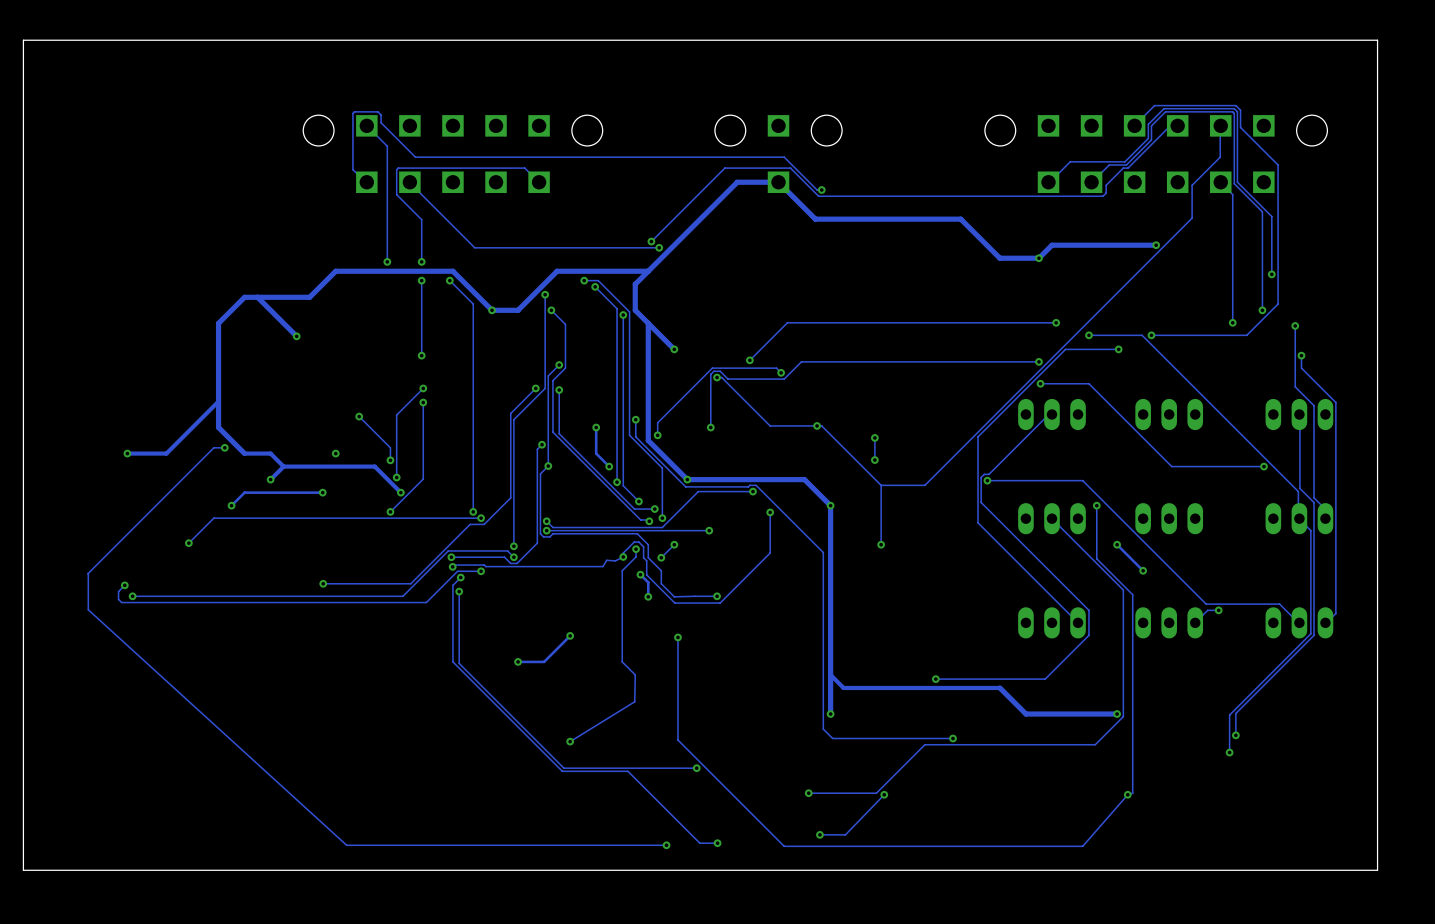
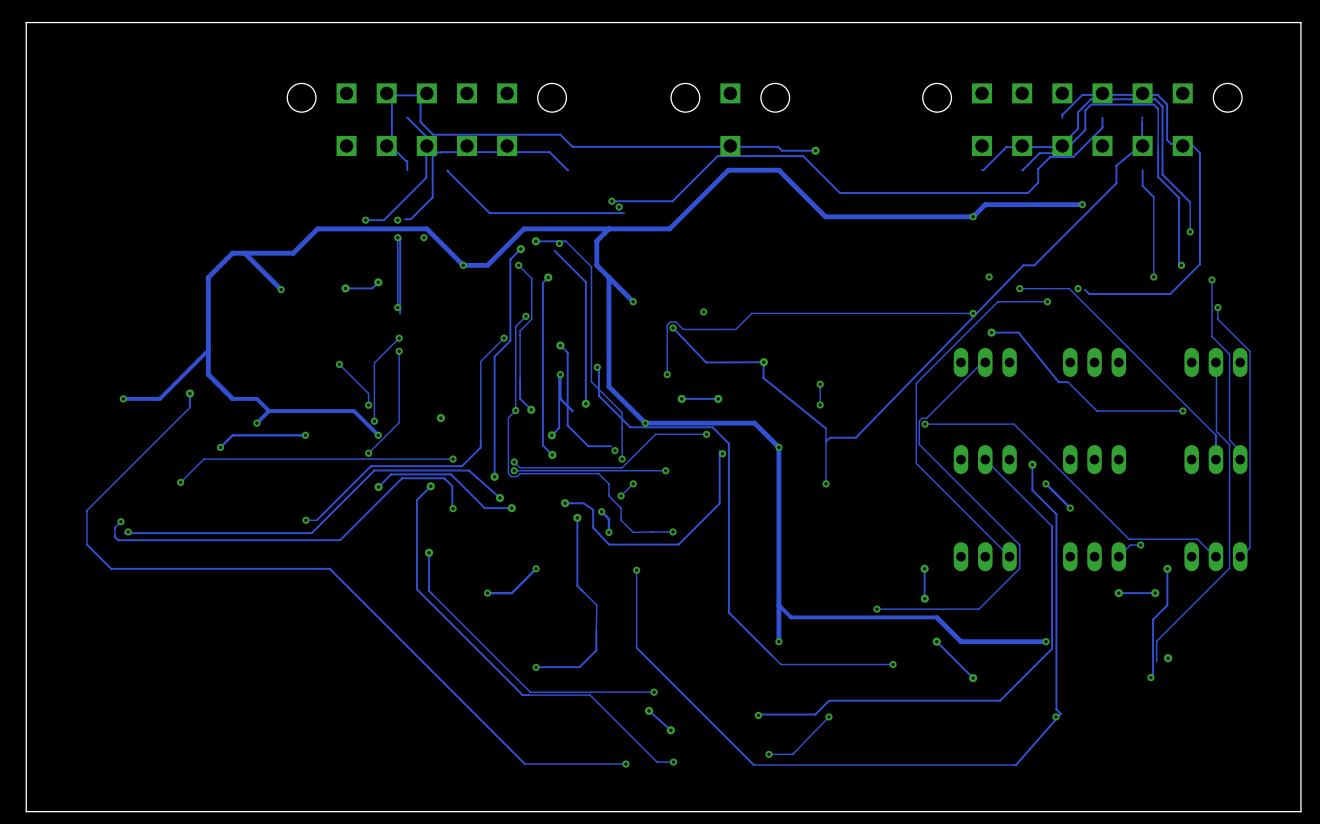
board edge: (1377, 40) (23, 40) (23, 870) (1377, 870) (1377, 40) -> (1300, 22) (1300, 811) (26, 811) (26, 22) (1300, 22)
track: (367, 125) (387, 146) (387, 261) -> (407, 117) (426, 136) (426, 177) (383, 220) (365, 220)
track: (1134, 125) (1154, 105) (1235, 105) (1240, 110) (1240, 127) (1278, 164) (1278, 304) (1246, 335) (1151, 335) -> none
track: (1177, 125) (1170, 125) (1128, 168) (1123, 168) (1106, 185) (1106, 193) (1103, 196) (818, 196) (790, 168) (724, 168) (651, 241) -> (1102, 117) (1102, 127) (1073, 157) (1050, 157) (1038, 168) (1038, 182) (1028, 192) (840, 192) (803, 156) (717, 156) (672, 201) (611, 201)
track: (1220, 125) (1220, 151) -> (1142, 117) (1142, 117)
track: (1237, 142) (1237, 111) (1234, 108) (1163, 108) (1148, 124) (1148, 138) (1124, 161) (1070, 161) (1048, 182) -> (1158, 109) (1153, 104) (1091, 104) (1085, 110) (1085, 130) (1062, 153) (1039, 153) (1022, 170)
track: none -> (1062, 117) (1062, 114) (1082, 94) (1157, 94) (1167, 104) (1167, 140) (1171, 143) (1190, 143) (1199, 152) (1199, 264) (1170, 294) (1089, 294) (1084, 289)
track: (1220, 157) (1192, 185) (1192, 218) (924, 485) (881, 485) (821, 425) (770, 425) (721, 377) (717, 377) -> (1142, 122) (1142, 144) (1116, 165) (1116, 183) (1034, 265) (1023, 265) (855, 437) (829, 437) (826, 441)
track: (366, 182) (352, 169) (352, 113) (354, 111) (377, 111) (381, 114) (381, 122) (415, 157) (784, 157) (817, 189) (821, 189) -> none
track: (409, 182) (474, 247) (659, 247) -> none
track: (538, 182) (524, 168) (398, 168) (396, 194) (421, 219) (421, 261) -> none
track: (1091, 182) (1109, 164) (1126, 164) (1151, 139) (1151, 125) (1165, 111) (1232, 111) (1234, 113) (1234, 183) (1262, 211) (1262, 310) -> none
track: (1220, 182) (1232, 194) (1232, 237) -> (1142, 170) (1142, 185) (1153, 197)
track: (1237, 182) (1271, 216) (1271, 242) -> (1158, 145) (1158, 176) (1179, 197) (1179, 265)
track: none -> (815, 150) (782, 150) (778, 146) (572, 146) (560, 134) (433, 134) (420, 122) (420, 98) (417, 95) (395, 95) (391, 99) (391, 146) (407, 161) (407, 170)
via: none -> (815, 150)
via: (821, 189) -> none
track: none -> (447, 170) (489, 213) (624, 213)
track: none -> (567, 170) (549, 152) (437, 152) (432, 157) (432, 197) (410, 219) (405, 219)
track: none -> (982, 170) (1006, 147) (1059, 147) (1078, 128) (1078, 112) (1090, 99) (1155, 99) (1162, 106) (1162, 174) (1190, 202)
track: (999, 258) (960, 219) (815, 219) (778, 182) (737, 182) (648, 271) -> (936, 216) (825, 216) (778, 170) (728, 170) (669, 228) (608, 228)
track: (449, 280) (473, 304) (473, 511) -> none
track: (584, 280) (598, 280) (602, 284) -> (535, 241) (565, 241)
via: (584, 280) -> none
track: none -> (401, 238) (400, 313)
via: none -> (535, 241)
track: (595, 286) (617, 308) (617, 482) -> none
track: none -> (520, 249) (510, 259) (510, 340) (494, 356) (494, 476)
via: none -> (520, 249)
track: (545, 294) (545, 388) (513, 419) (513, 546) -> none
via: (545, 294) -> none
track: none -> (554, 250) (585, 282) (585, 403)
track: (623, 315) (623, 485) (638, 501) -> none
via: (623, 315) -> none
track: (1056, 322) (787, 322) (749, 360) -> none
track: none -> (548, 277) (542, 282) (542, 445) (552, 454)
via: none -> (548, 277)
track: none -> (378, 282) (372, 288) (345, 288)
via: none -> (378, 282)
via: none -> (345, 288)
track: (781, 372) (776, 368) (712, 368) (657, 422) (657, 435) -> none
via: (781, 372) -> none
track: none -> (673, 327) (706, 362) (763, 362) (763, 378) (826, 428)
via: none -> (991, 332)
track: (1040, 383) (1088, 383) (1140, 435) -> (991, 332) (1018, 332) (1058, 382) (1068, 382)
via: (1040, 383) -> none
track: (559, 390) (559, 433) (634, 509) (654, 509) -> none
via: (559, 390) -> none
track: none -> (560, 345) (567, 352) (567, 425) (588, 446) (611, 446)
via: none -> (560, 345)
via: none -> (763, 362)
track: (635, 419) (635, 436) (685, 486) (756, 485) (823, 552) (823, 729) -> (599, 370) (599, 395) (630, 427) (712, 427) (728, 443) (728, 612) (772, 655)
via: (817, 425) -> none
track: none -> (559, 375) (559, 428) (551, 435)
track: (552, 432) (640, 519) (649, 521) -> (520, 378) (520, 398) (531, 409)
via: (657, 435) -> none
track: (542, 444) (537, 449) (537, 543) (517, 563) (510, 563) (504, 557) (451, 557) -> none
via: (542, 444) -> none
via: none -> (189, 393)
track: (224, 447) (213, 447) (198, 462) -> (189, 393) (189, 407)
via: (224, 447) -> none
via: (335, 453) -> none
via: none -> (681, 398)
track: none -> (718, 398) (681, 398)
via: none -> (718, 398)
via: none -> (585, 403)
via: none -> (531, 409)
via: (609, 466) -> none
via: none -> (440, 418)
via: (617, 482) -> none
track: (1298, 491) (1298, 518) (1310, 530) (1310, 633) (1229, 715) (1229, 752) -> (1214, 434) (1215, 459)
via: none -> (551, 435)
track: (510, 497) (484, 524) (470, 524) (410, 583) (334, 583) -> (480, 440) (480, 447) (462, 466) (371, 466) (316, 520)
via: (638, 501) -> none
track: (1096, 505) (1096, 558) (1132, 594) (1132, 793) (1127, 794) (1082, 846) -> (1032, 464) (1032, 490) (1056, 514) (1056, 709) (1060, 713) (1016, 765) (1013, 765)
via: (1096, 505) -> none
track: none -> (719, 450) (719, 503) (678, 544) (608, 544) (593, 527) (593, 509) (583, 503) (565, 503)
via: (473, 511) -> none
track: (770, 512) (770, 553) (720, 603) (674, 603) (646, 574) (646, 560) (643, 557) (643, 546) (638, 542) (634, 542) (623, 553) (623, 556) (615, 560) (606, 560) (602, 566) (454, 565) (452, 566) -> none
via: none -> (552, 454)
via: (649, 521) -> none
via: none -> (1032, 464)
via: none -> (494, 476)
via: (513, 546) -> none
via: none -> (430, 486)
track: none -> (378, 487) (391, 474) (451, 474) (484, 508) (511, 508)
via: none -> (378, 487)
track: (636, 549) (636, 556) (622, 570) (622, 661) -> (577, 517) (577, 585) (584, 593)
via: (636, 549) -> none
via: (623, 556) -> none
via: (451, 557) -> none
track: (513, 557) (507, 550) (448, 550) (402, 596) (132, 596) -> none
via: (513, 557) -> none
track: none -> (499, 497) (468, 470) (374, 470) (311, 533) (124, 533)
via: none -> (499, 497)
via: none -> (565, 503)
via: (452, 566) -> none
via: none -> (511, 508)
track: (481, 571) (457, 571) (426, 602) (121, 602) (118, 599) -> (452, 508) (452, 486) (444, 478) (402, 478) (340, 540) (118, 540) (115, 534)
track: (460, 577) (452, 585) (452, 661) (562, 771) -> (430, 486) (416, 500) (416, 589) (522, 695) (528, 695)
via: (460, 577) -> none
via: none -> (577, 517)
track: (1123, 590) (1123, 716) (1095, 744) (924, 744) (876, 793) (808, 793) -> (1051, 526) (1052, 648) (1000, 700) (829, 700) (815, 714) (757, 714)
track: (459, 591) (459, 663) -> (429, 552) (429, 590) (432, 594)
via: (459, 591) -> none
track: (88, 609) (346, 845) (558, 845) -> (86, 544) (111, 568) (329, 568) (524, 764)
via: none -> (429, 552)
track: none -> (924, 568) (924, 598)
via: none -> (924, 568)
track: none -> (1167, 568) (1167, 605) (1153, 619) (1153, 678)
via: none -> (1167, 568)
via: none -> (1118, 593)
track: none -> (1155, 593) (1118, 593)
via: none -> (1155, 593)
via: none -> (924, 598)
track: (634, 701) (570, 741) -> (596, 630) (596, 650) (579, 667) (536, 667)
track: none -> (936, 641) (973, 678)
via: none -> (936, 641)
track: (677, 720) (677, 740) (784, 846) (803, 846) -> (636, 647) (753, 765)
via: none -> (1168, 658)
via: (1235, 735) -> none
via: none -> (973, 678)
track: none -> (649, 710) (670, 730)
via: none -> (649, 710)
via: none -> (670, 730)

